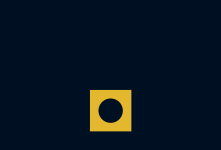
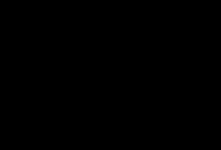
part: (110, 110) -> none

